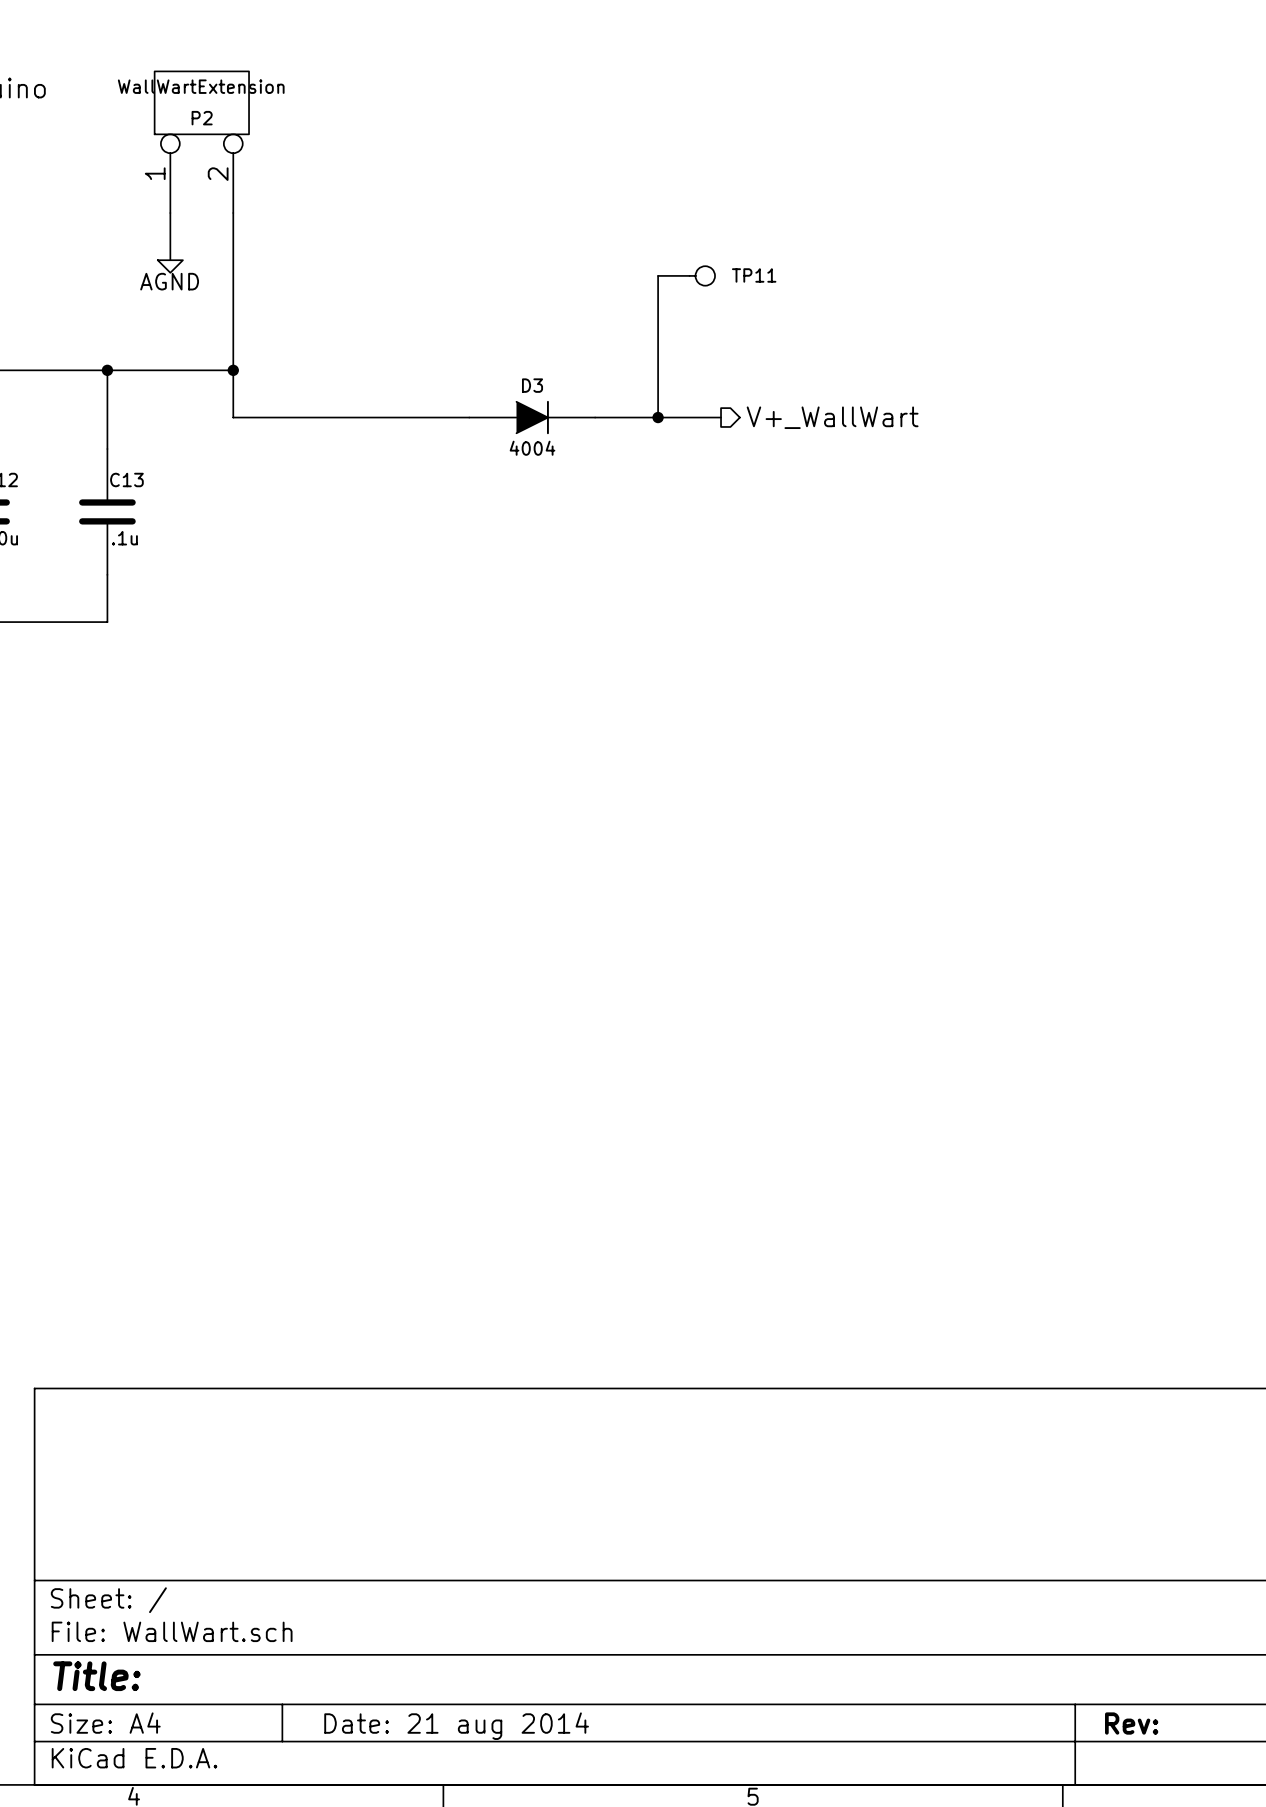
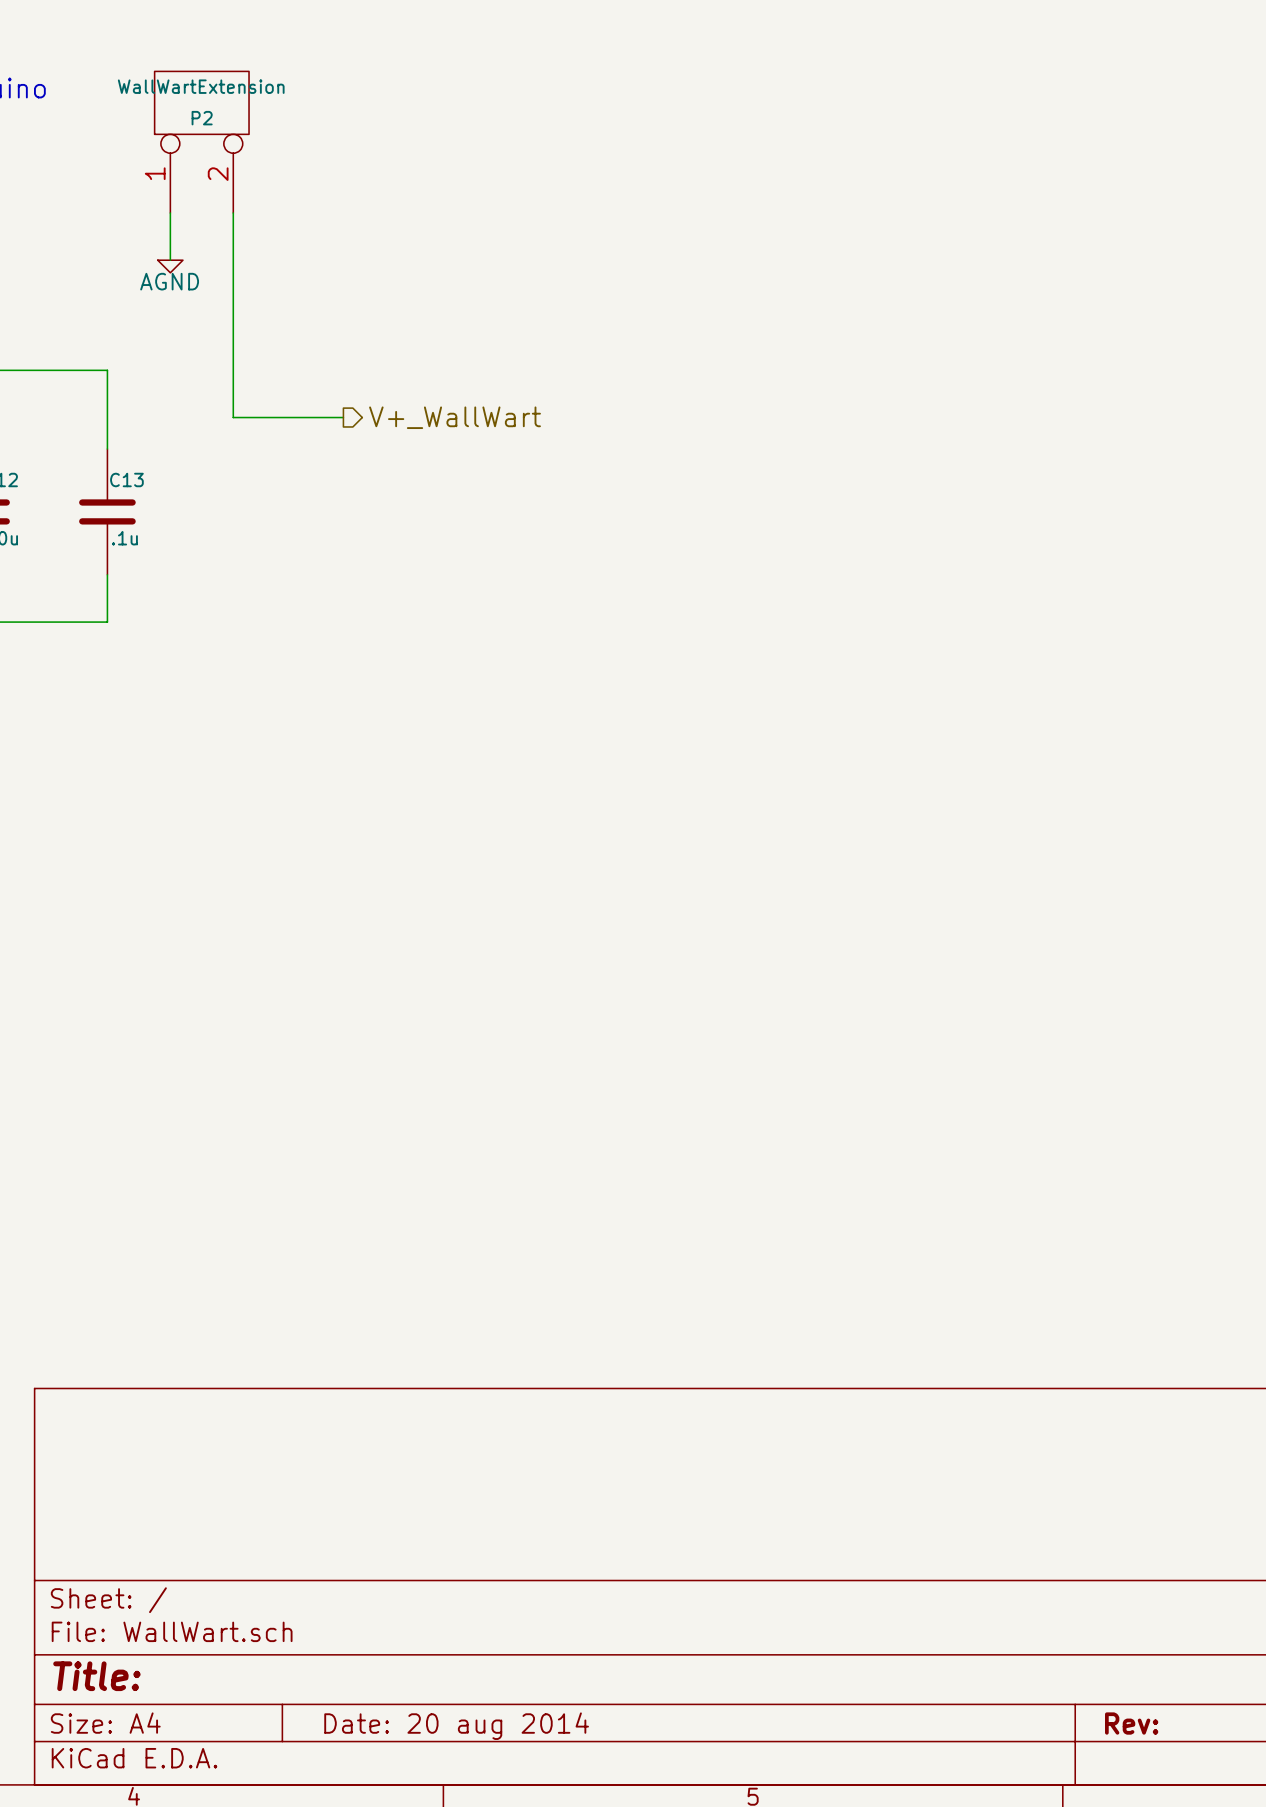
wire: (658, 275) (658, 417) -> none
TP11: (686, 275) -> none
wire: (107, 370) (233, 370) -> none
junction: (107, 370) -> none
junction: (233, 370) -> none
wire: (343, 417) (469, 417) -> none
hierarchical label: none -> V+_WallWart (455, 417)
D3: 4004 (532, 417) -> none
wire: (595, 417) (721, 417) -> none
junction: (658, 417) -> none
hierarchical label: V+_WallWart (832, 417) -> none
title block: Date: 21 aug 2014 (456, 1726) -> Date: 20 aug 2014 (456, 1726)

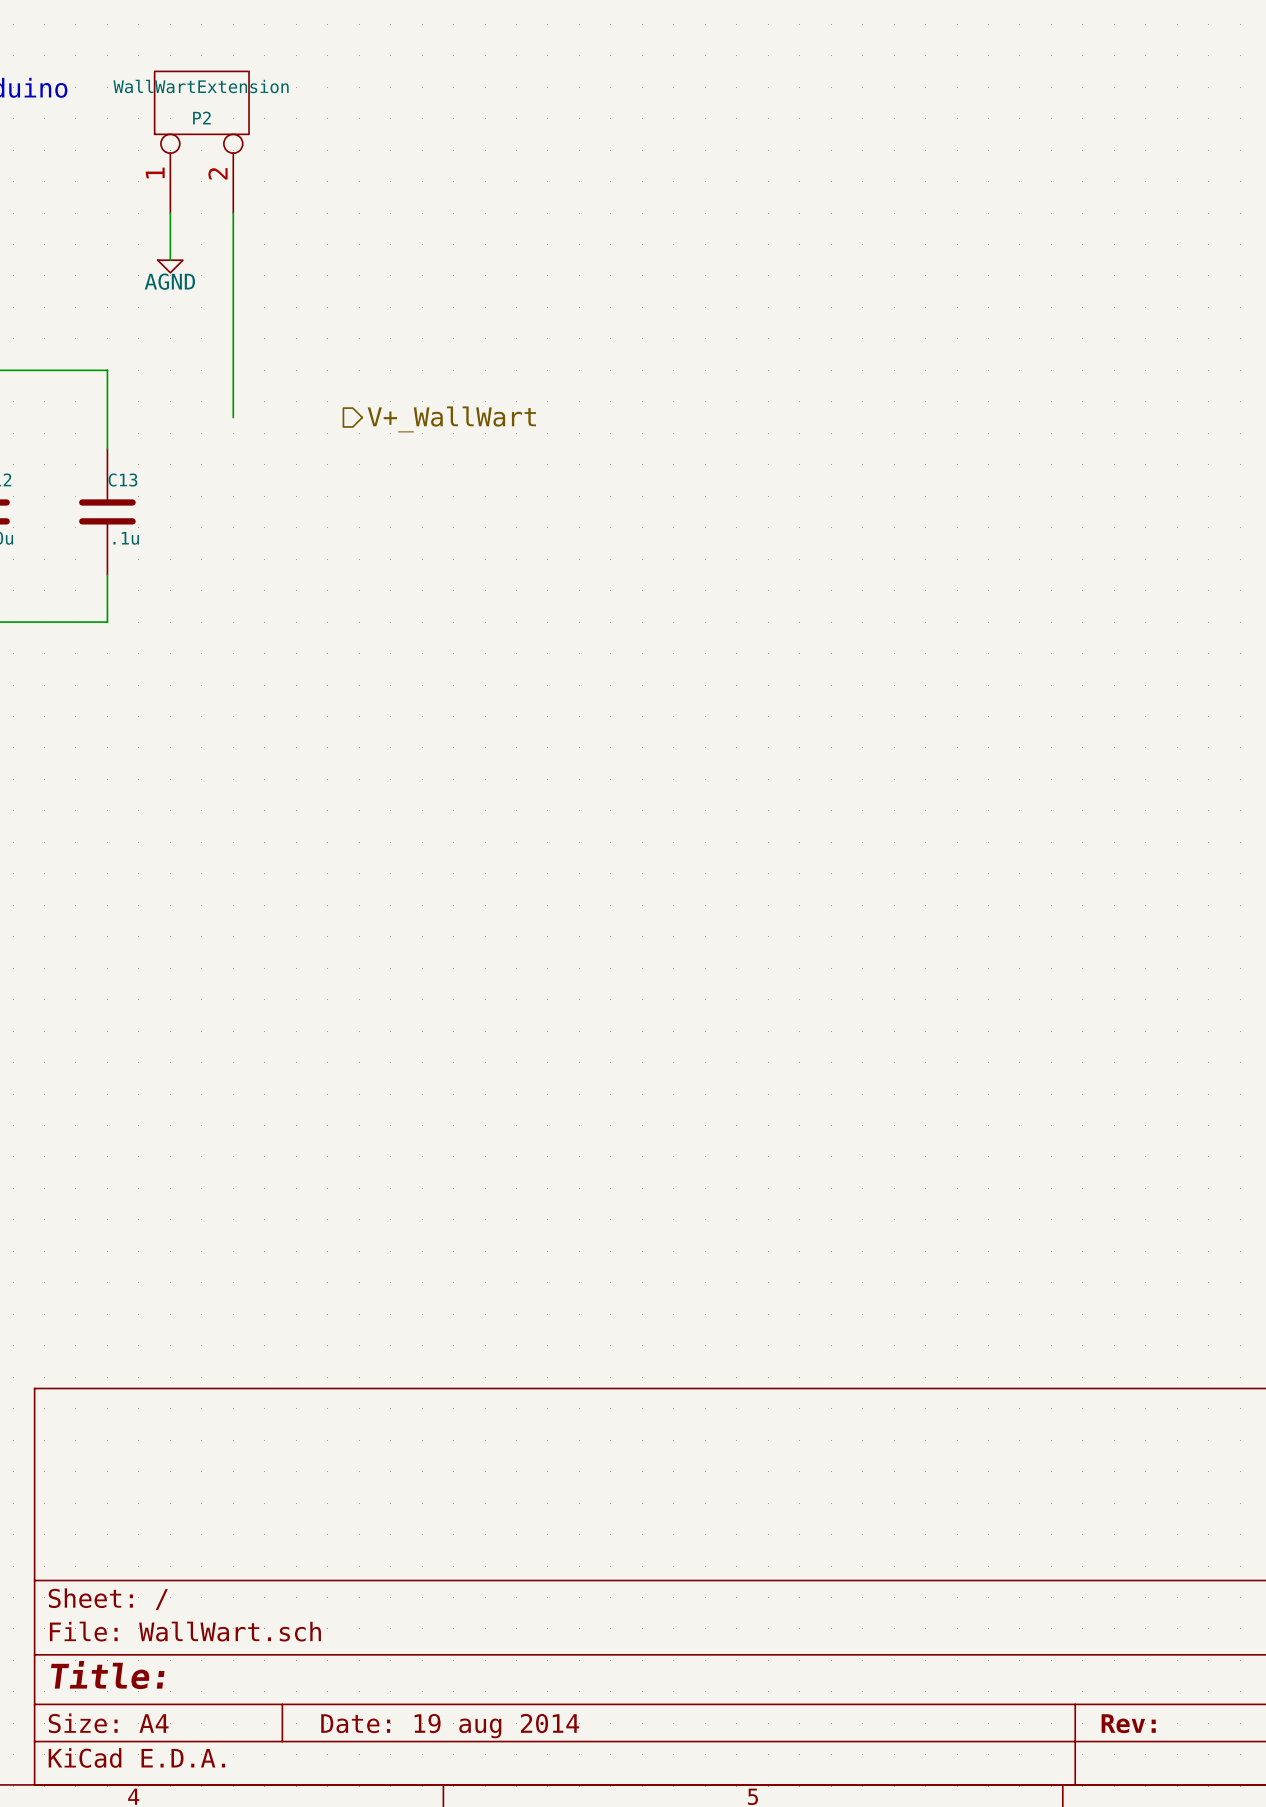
wire: (233, 417) (343, 417) -> none
title block: Date: 20 aug 2014 (456, 1726) -> Date: 19 aug 2014 (450, 1726)

